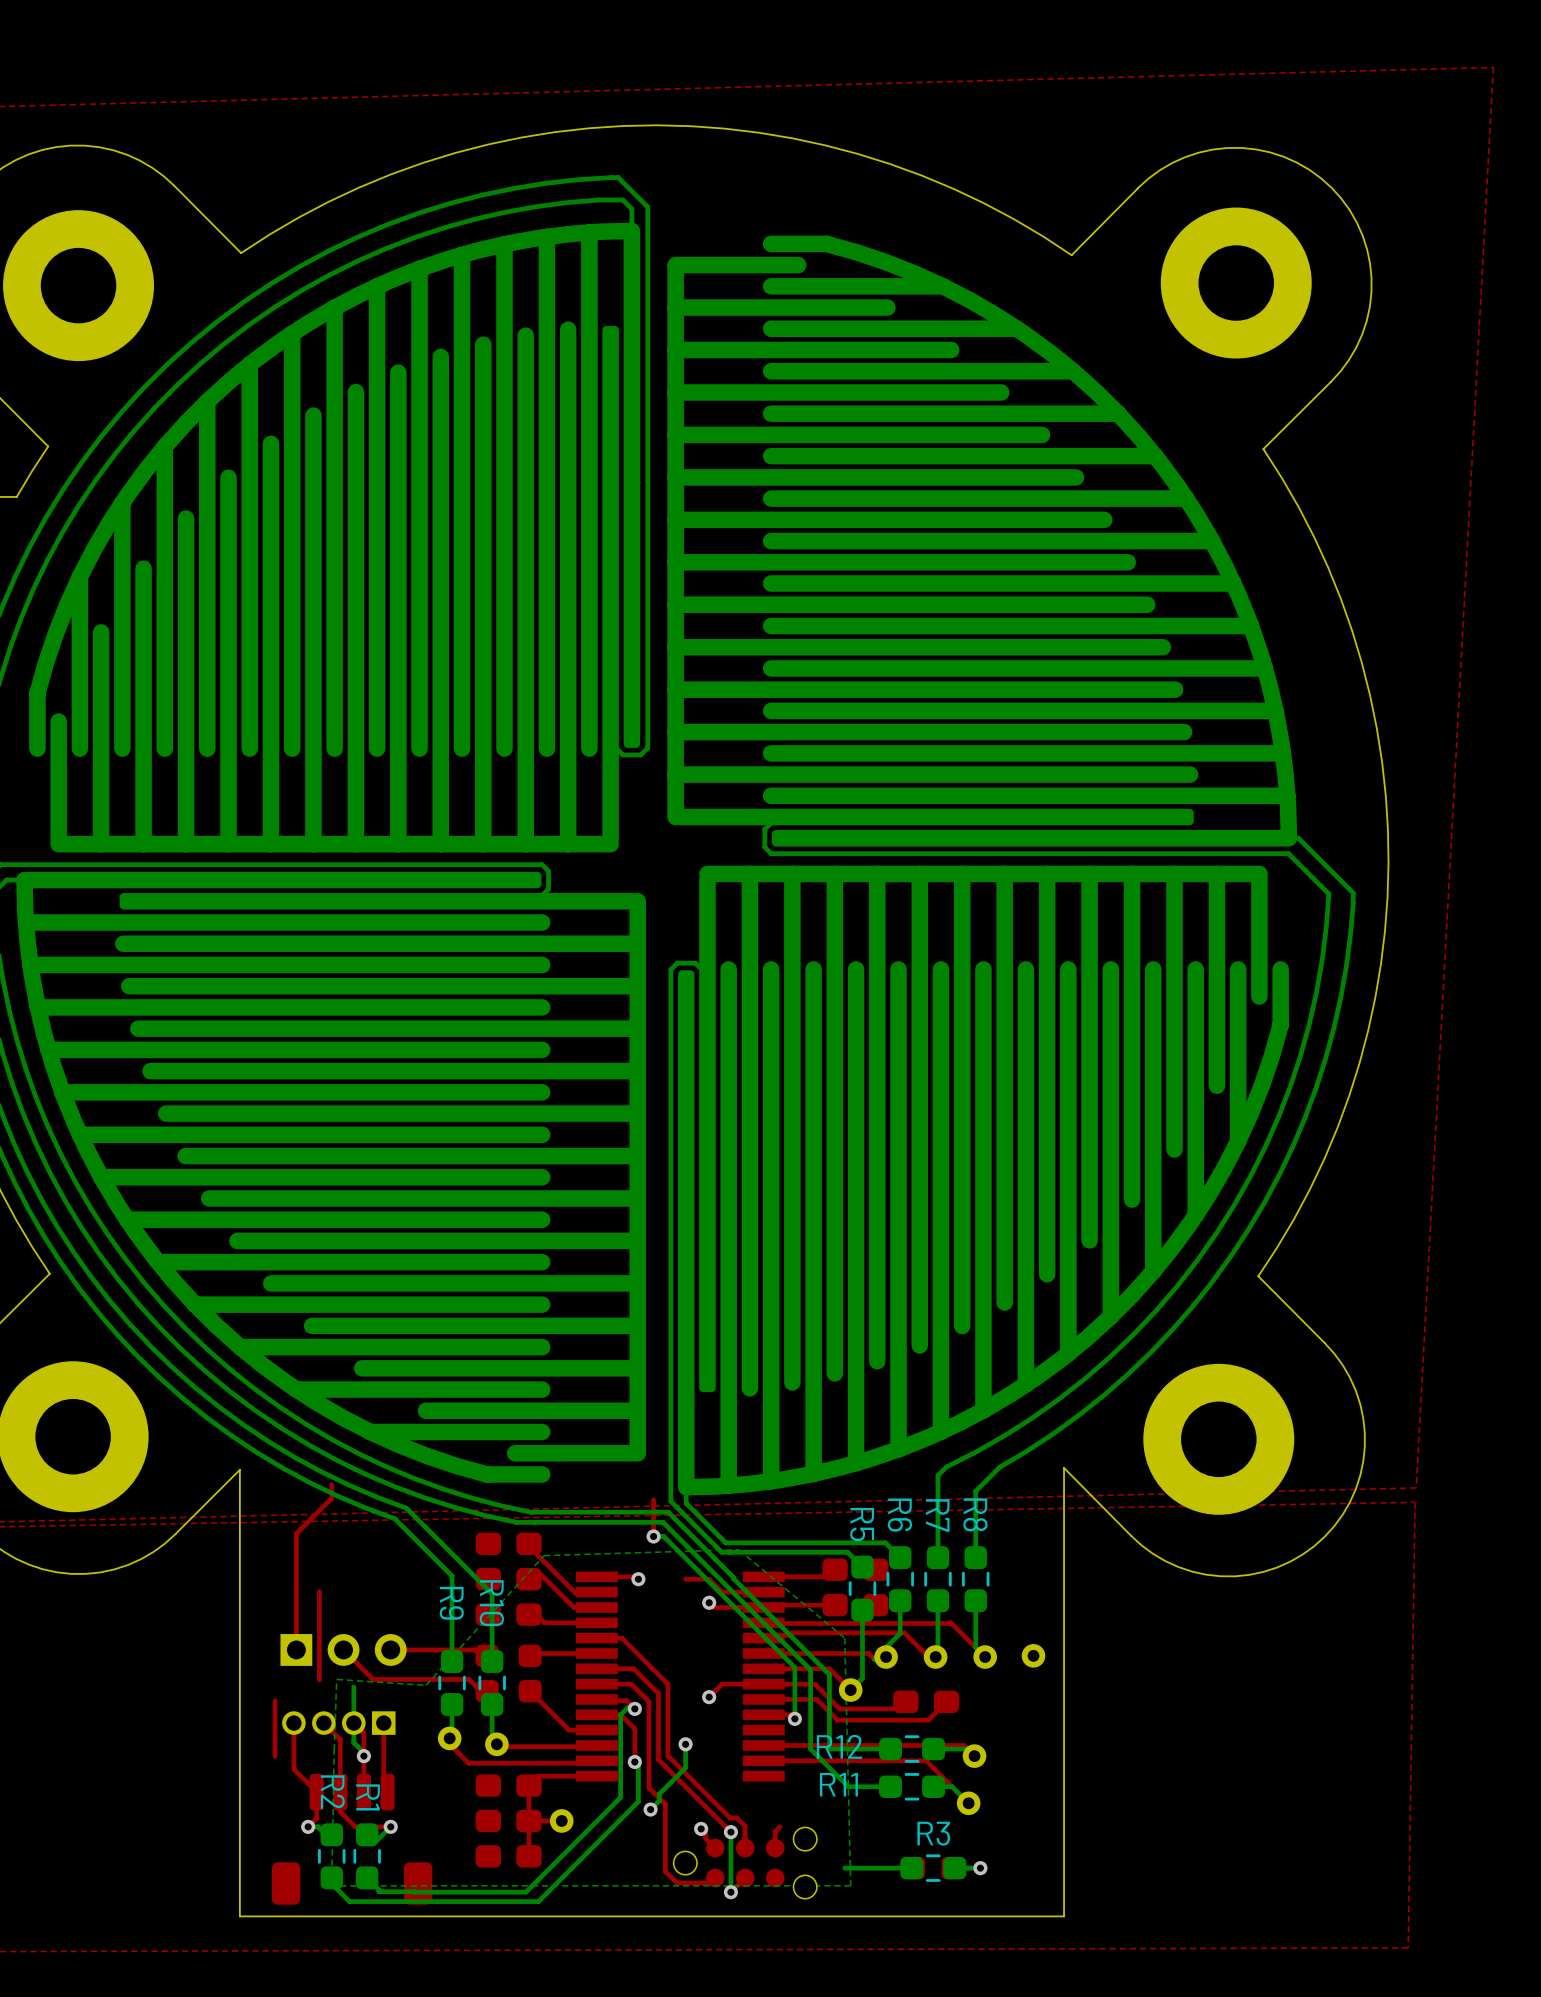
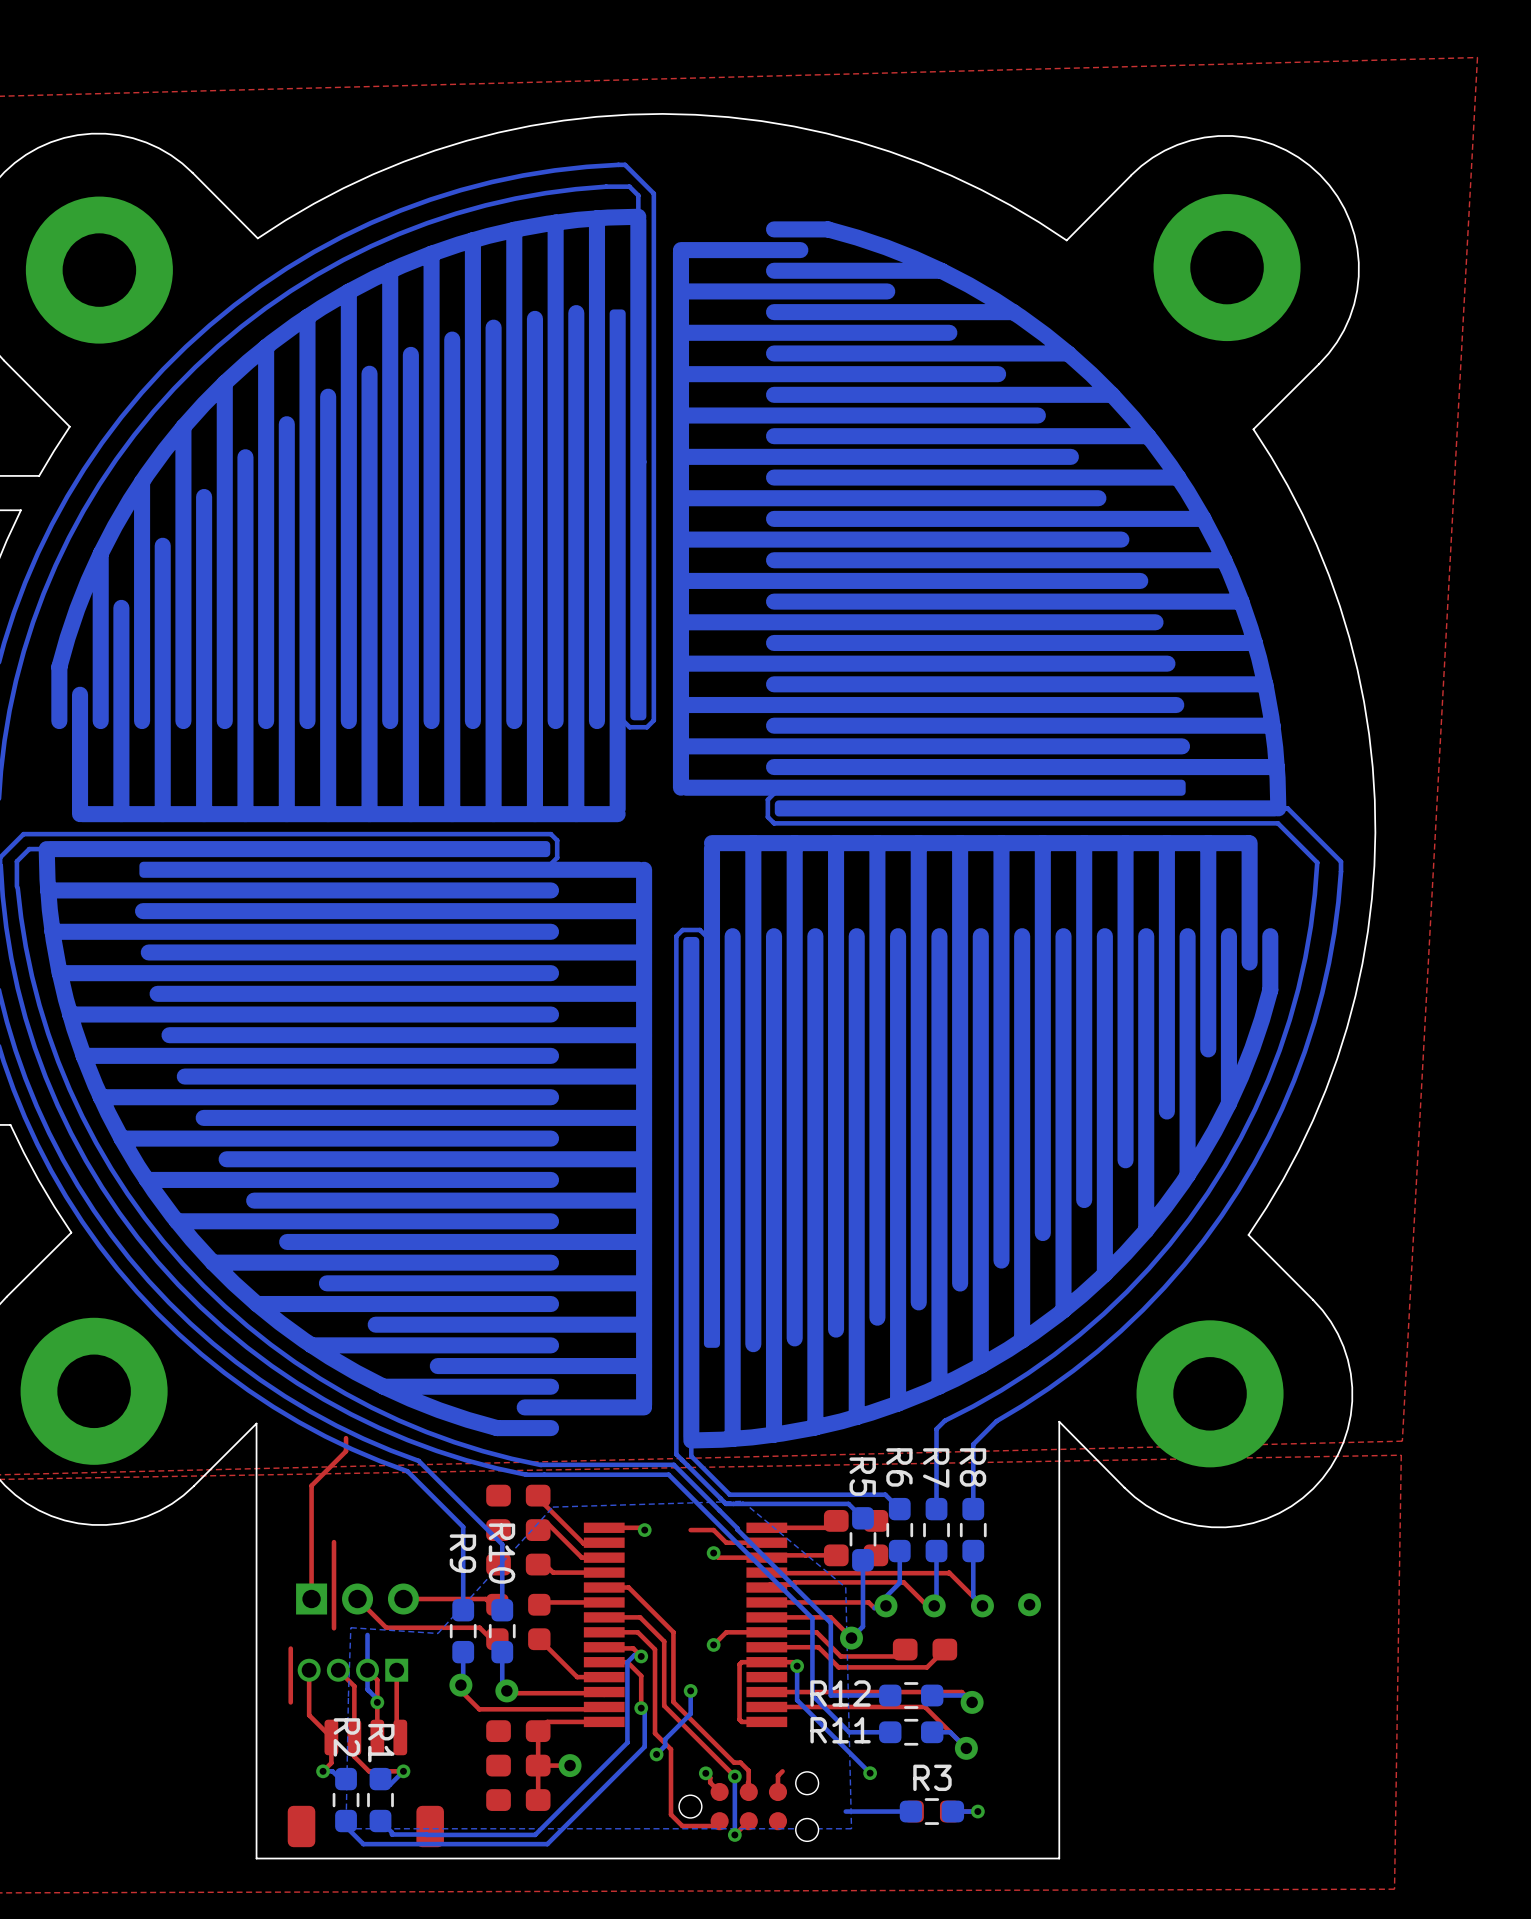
top track: (653, 1499) (653, 1536) -> none
bottom track: (653, 1536) (663, 1536) (794, 1667) (794, 1718) -> (870, 1773) (797, 1700) (797, 1666)
via: (653, 1536) -> none
top track: none -> (766, 1662) (741, 1662) (739, 1664) (739, 1719) (741, 1721) (766, 1721)
via: none -> (870, 1773)

